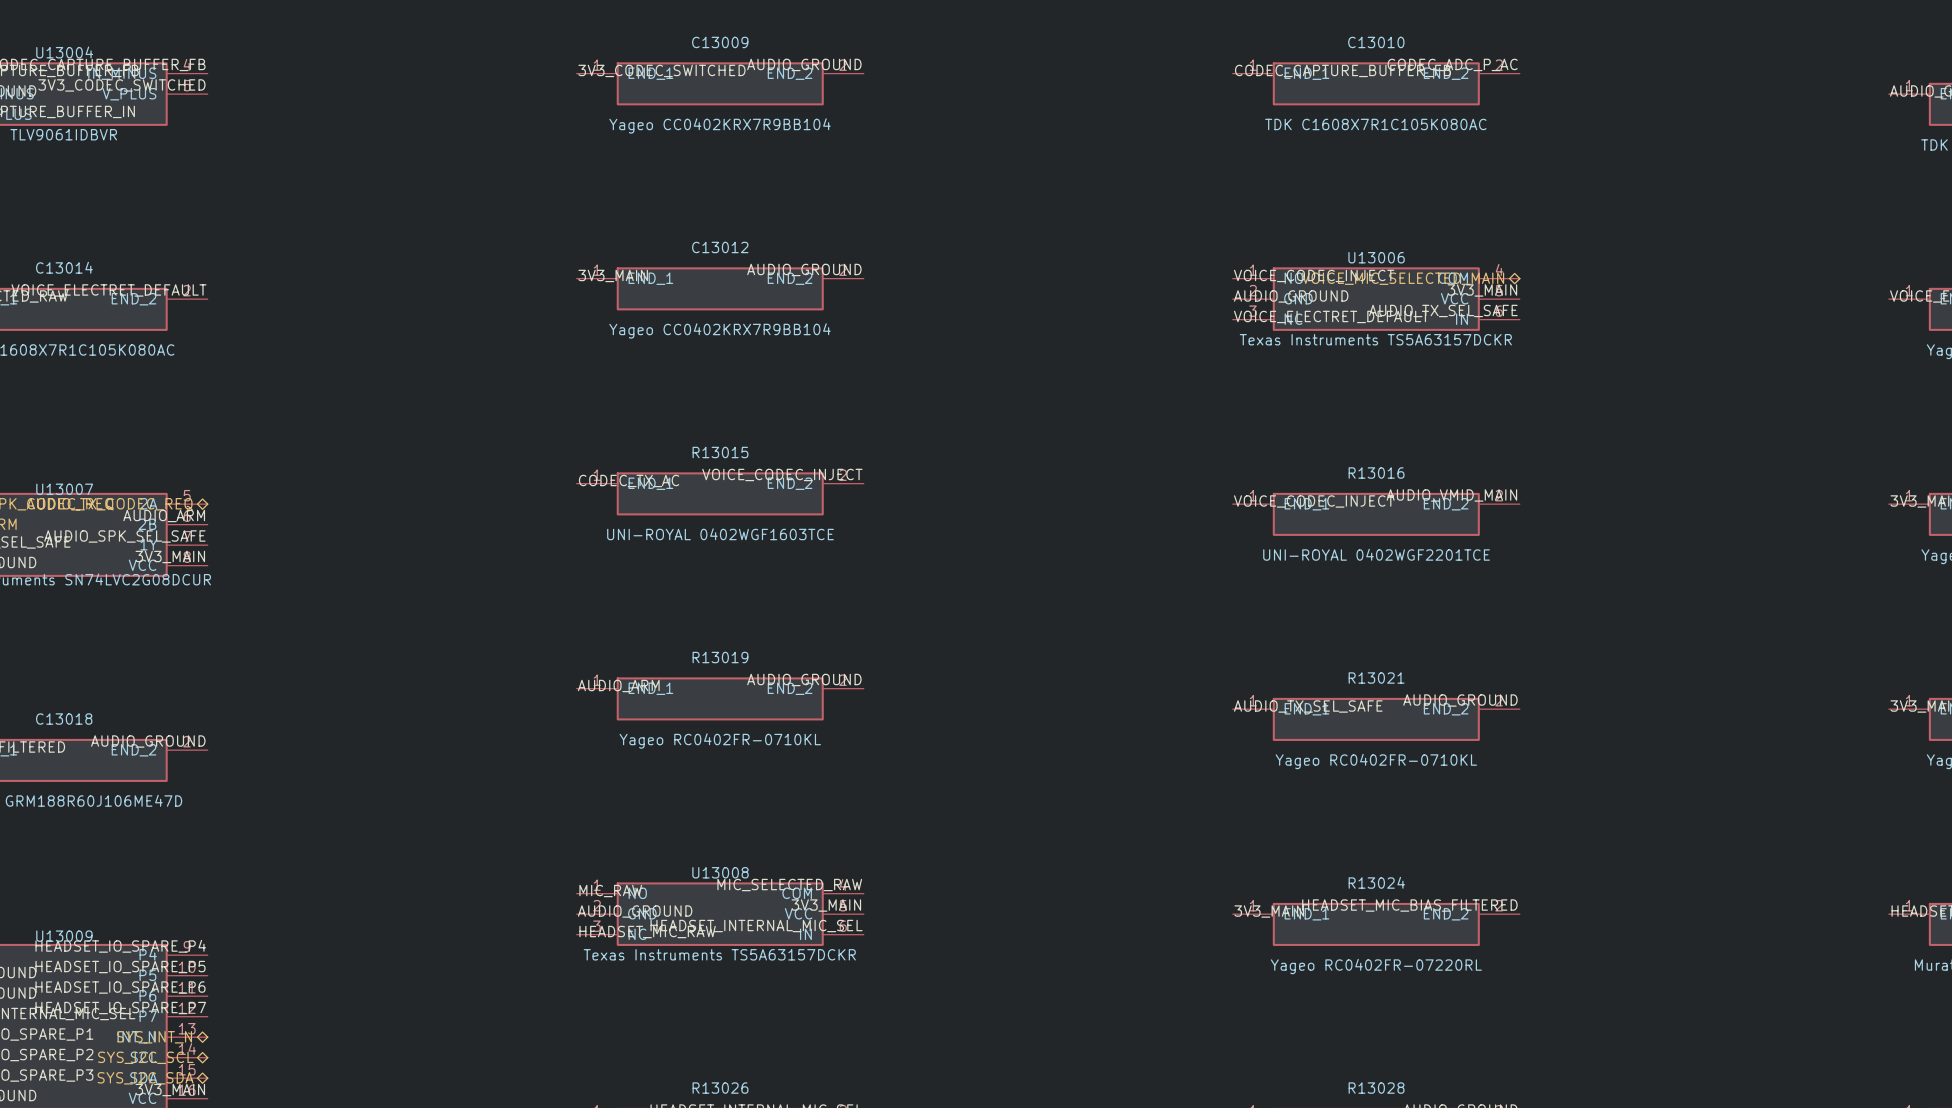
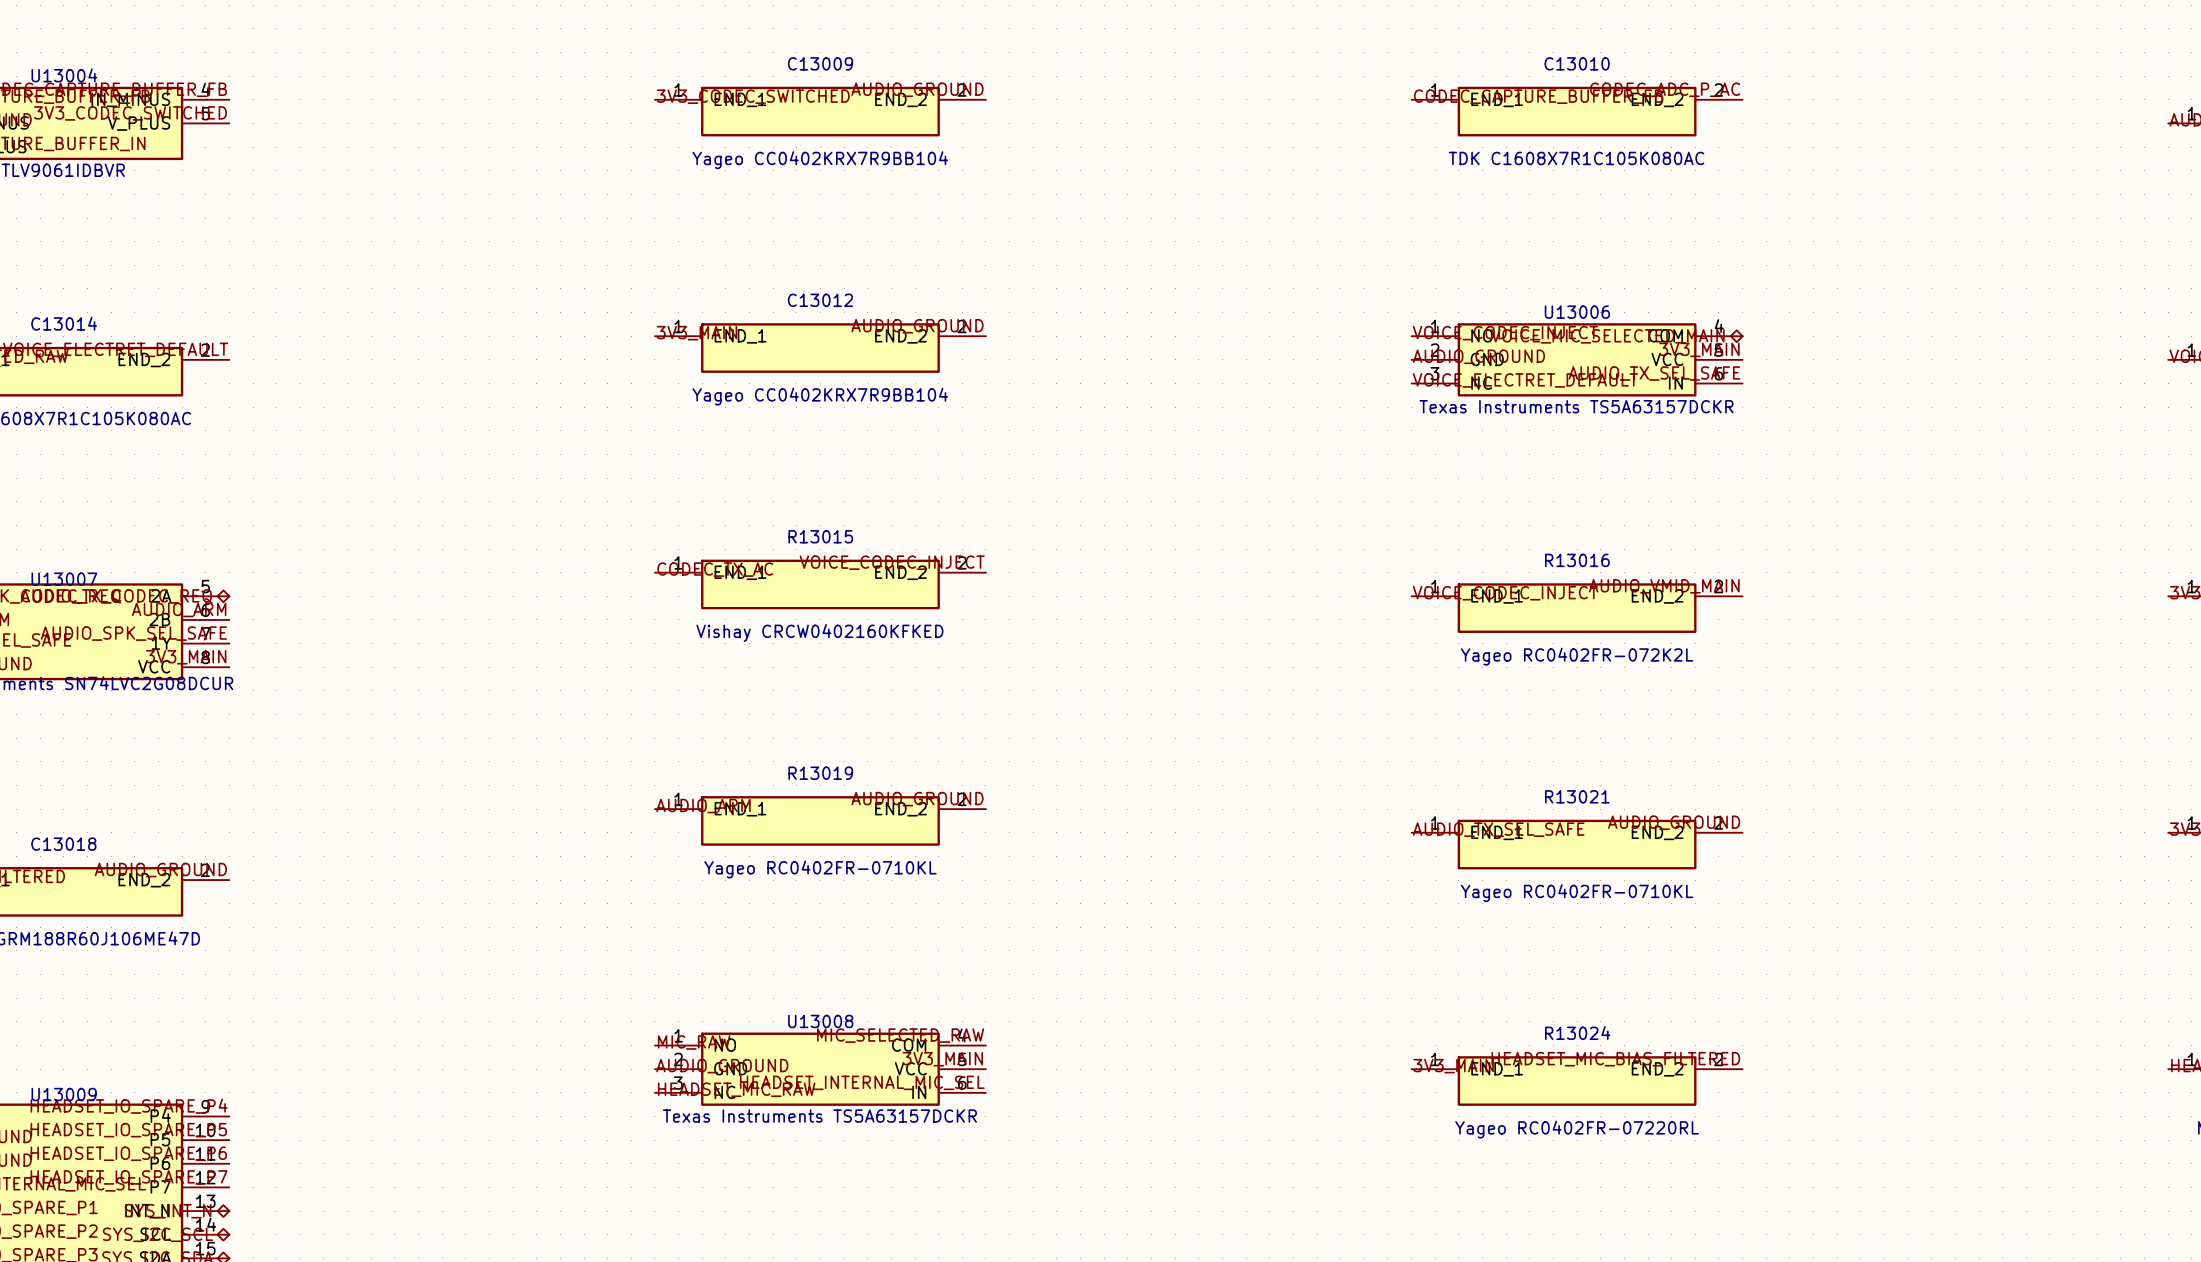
R13015 value: UNI-ROYAL 0402WGF1603TCE (720, 534) -> Vishay CRCW0402160KFKED (819, 633)
R13016 value: UNI-ROYAL 0402WGF2201TCE (1376, 554) -> Yageo RC0402FR-072K2L (1577, 656)

